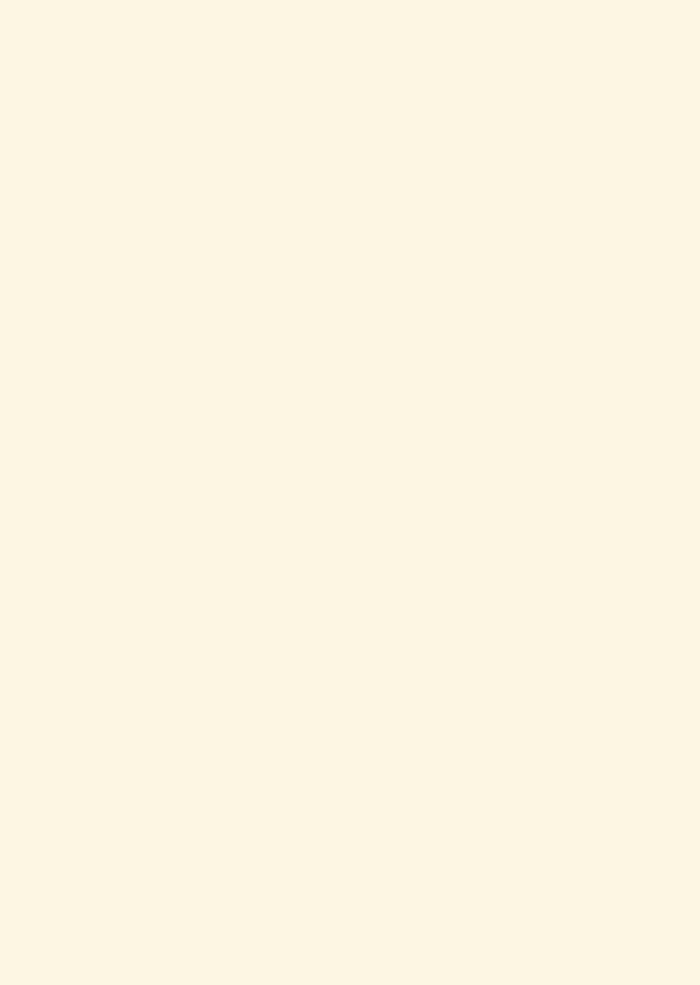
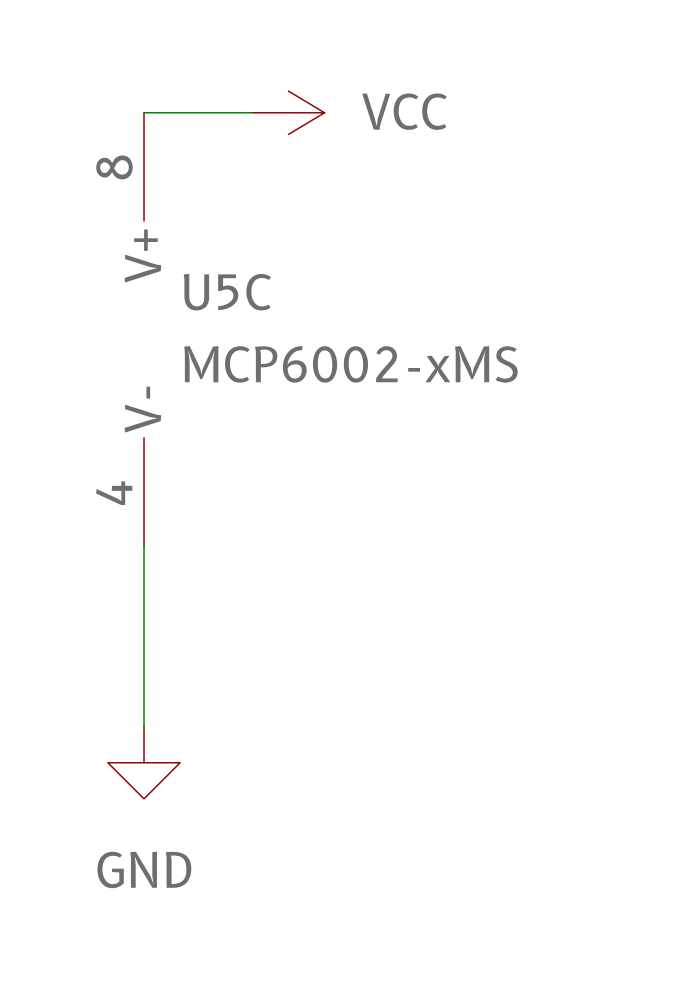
wire: none -> (144, 112) (252, 112)
power symbol: none -> VCC (288, 112)
U5C: none -> MCP6002-xMS (144, 329)
wire: none -> (144, 546) (144, 726)
power symbol: none -> GND (144, 762)

